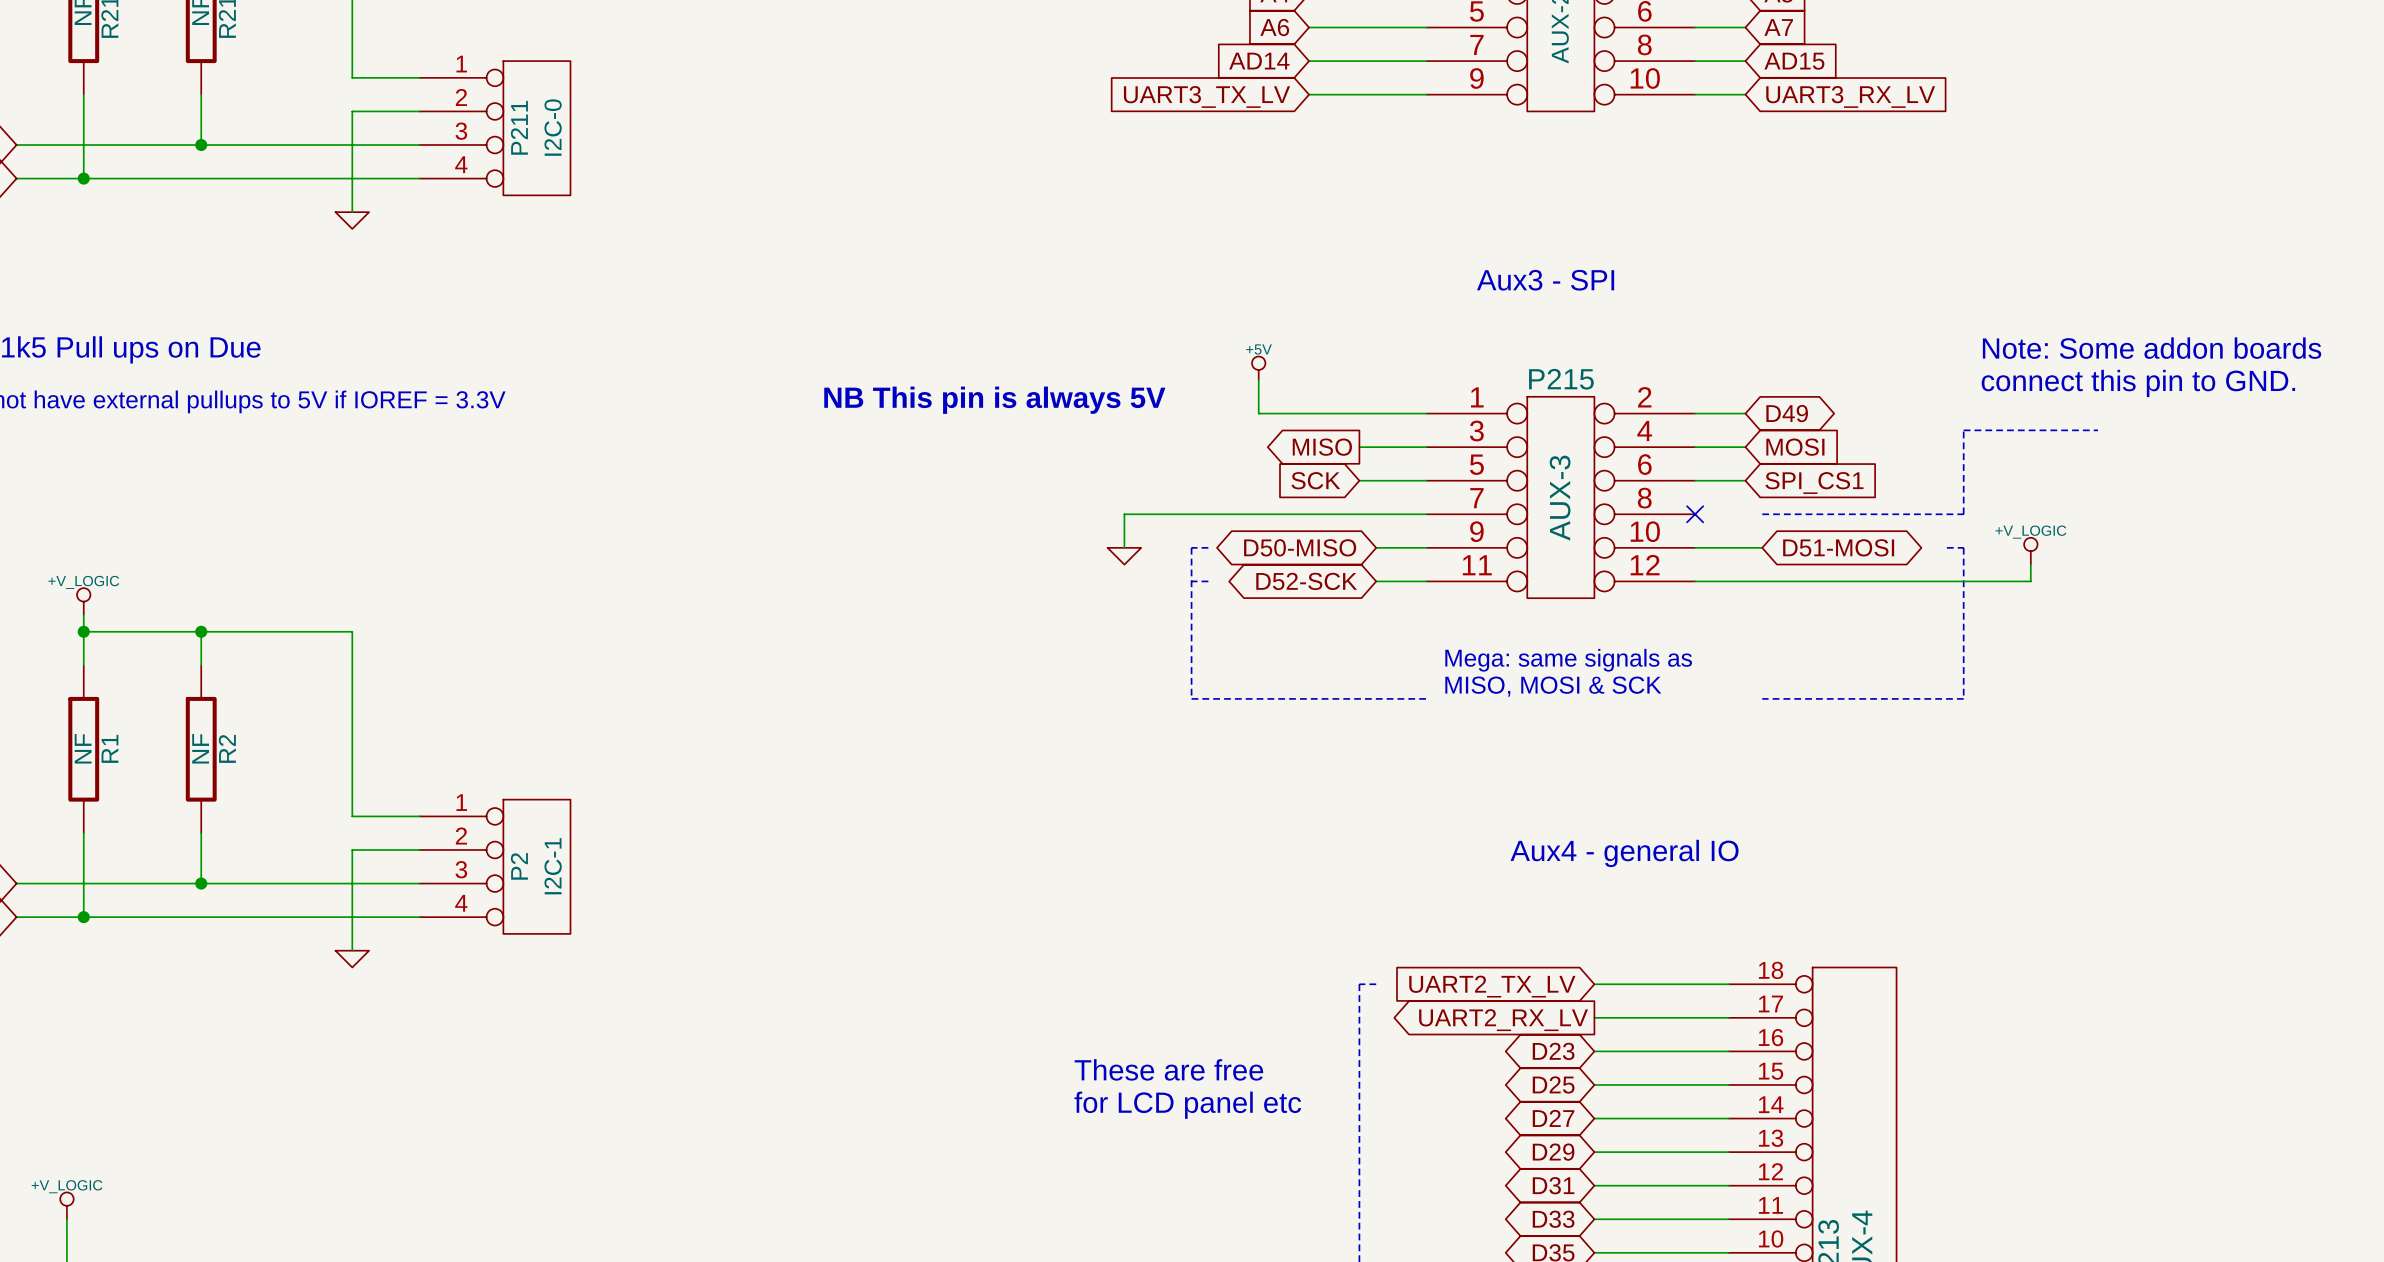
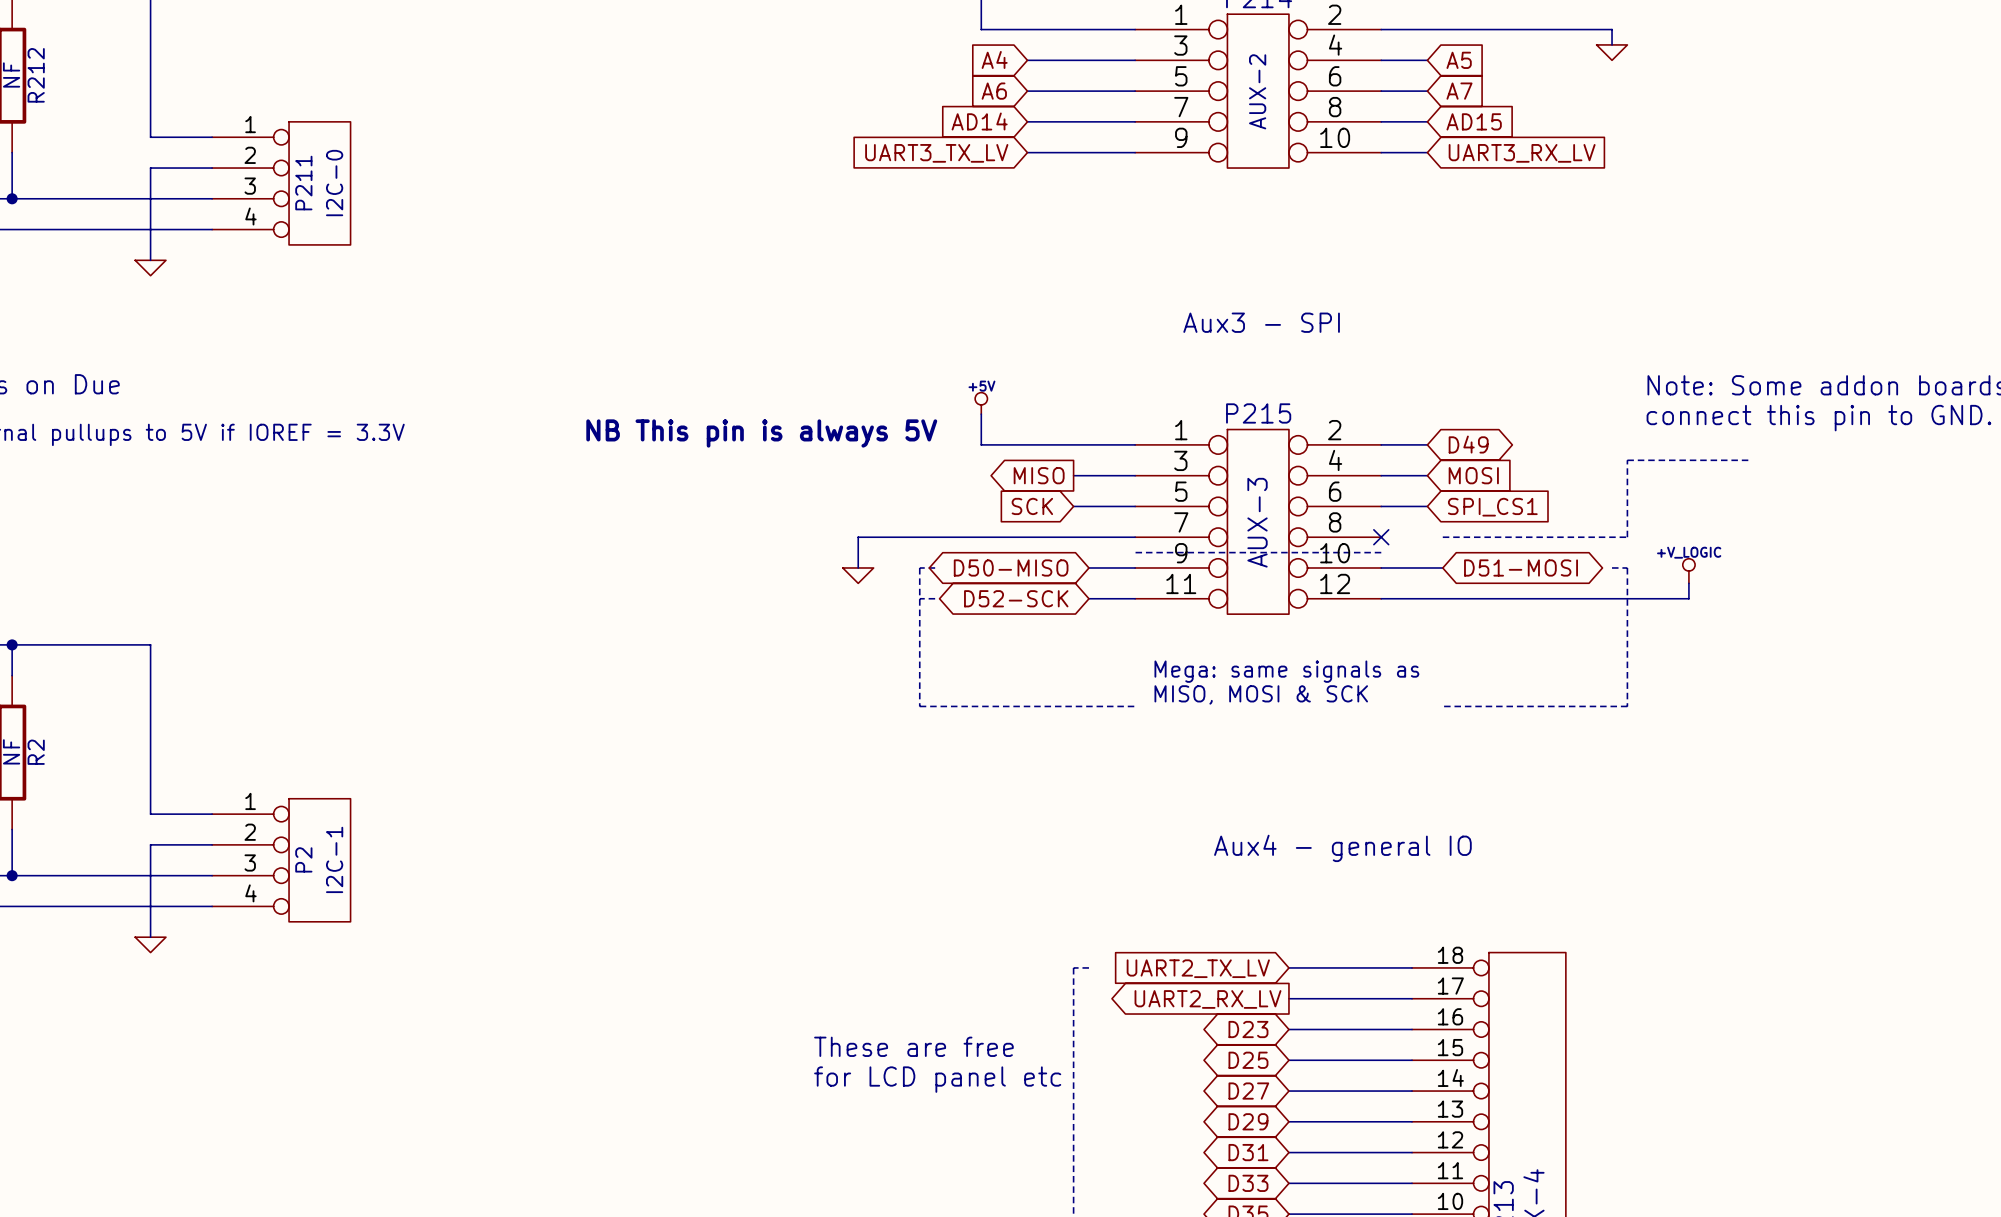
line: none -> (1135, 552) (1381, 552)

